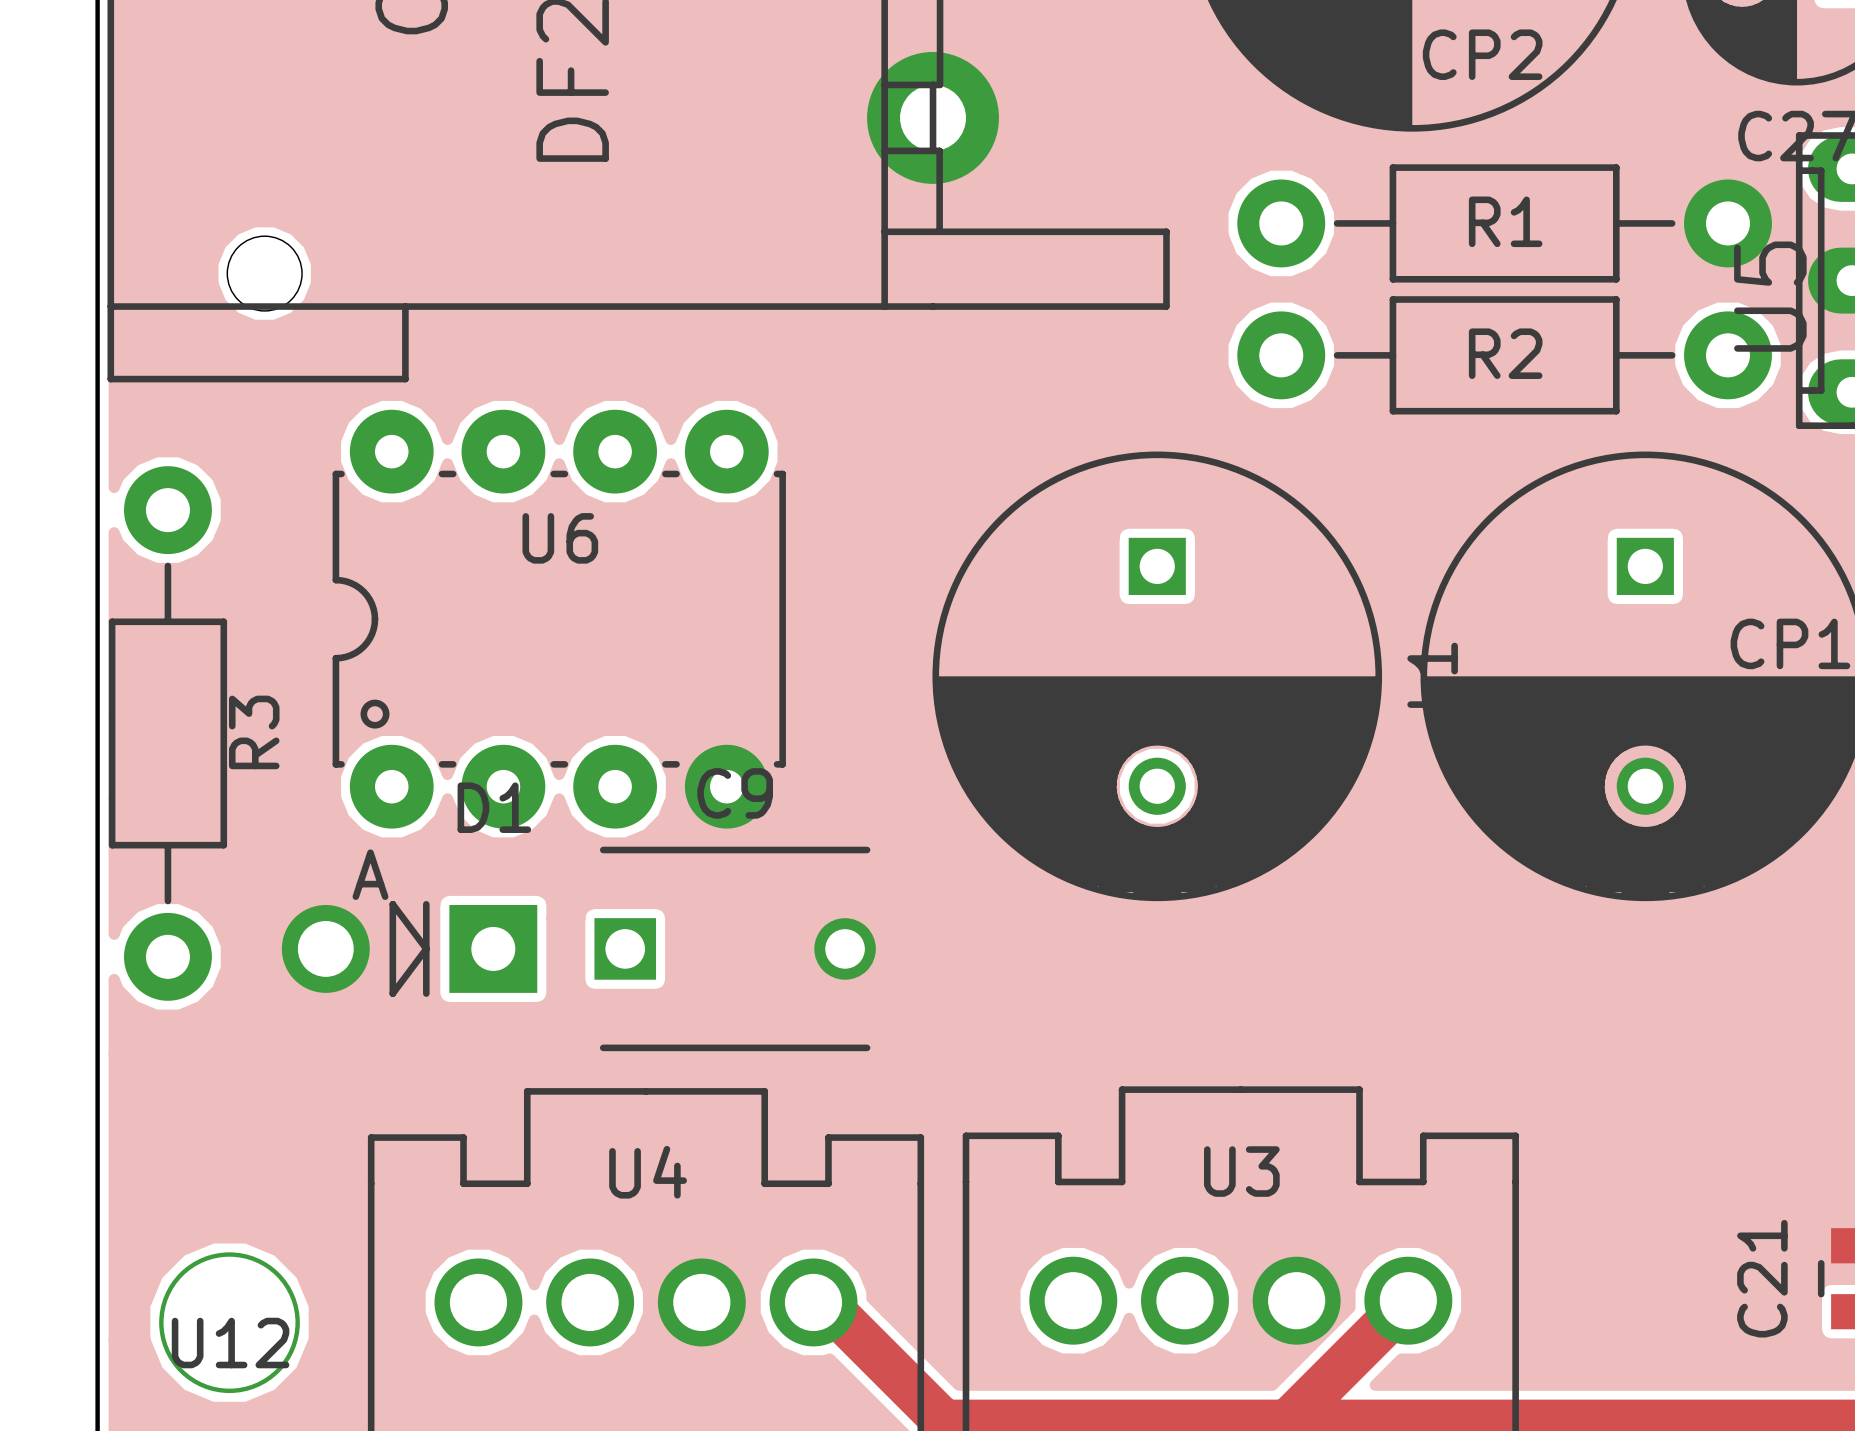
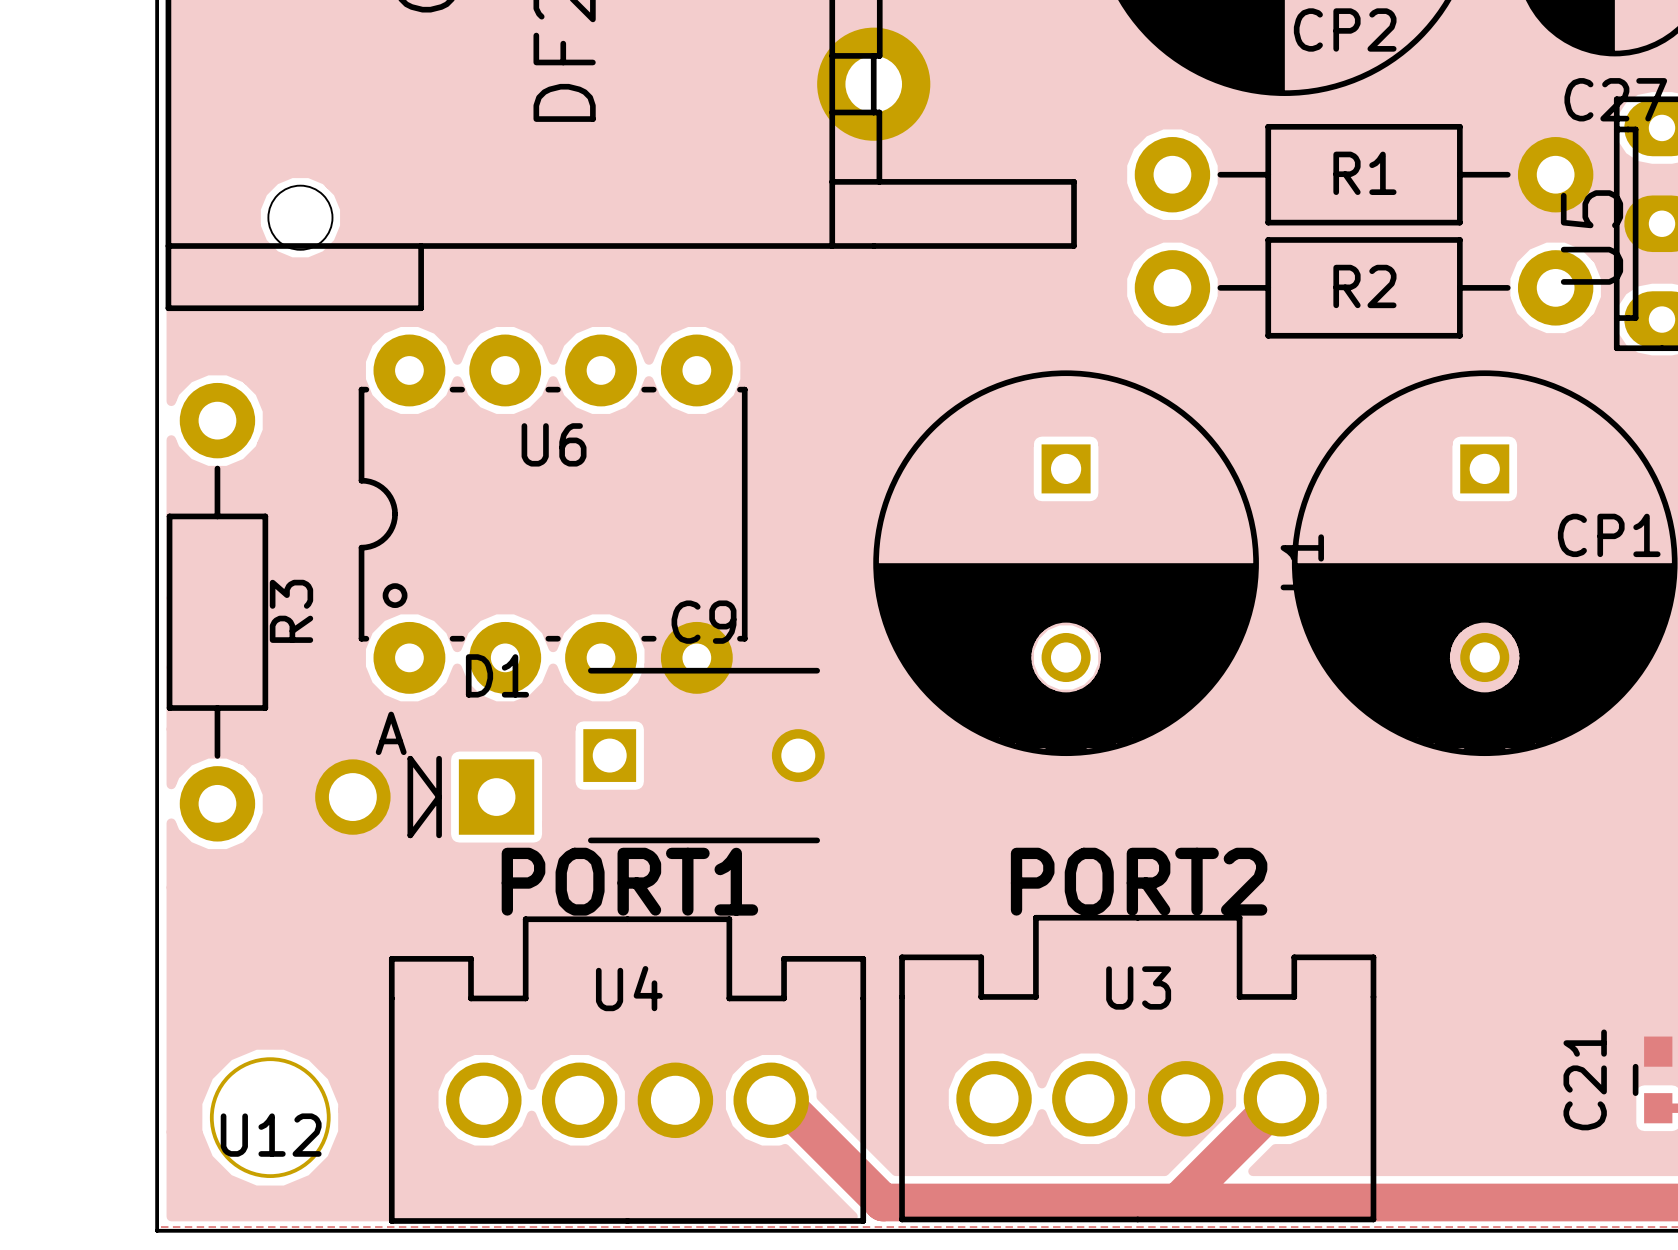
C9 position: (735, 948) -> (704, 755)
text: none -> PORT1 (629, 881)
text: none -> PORT2 (1139, 881)

